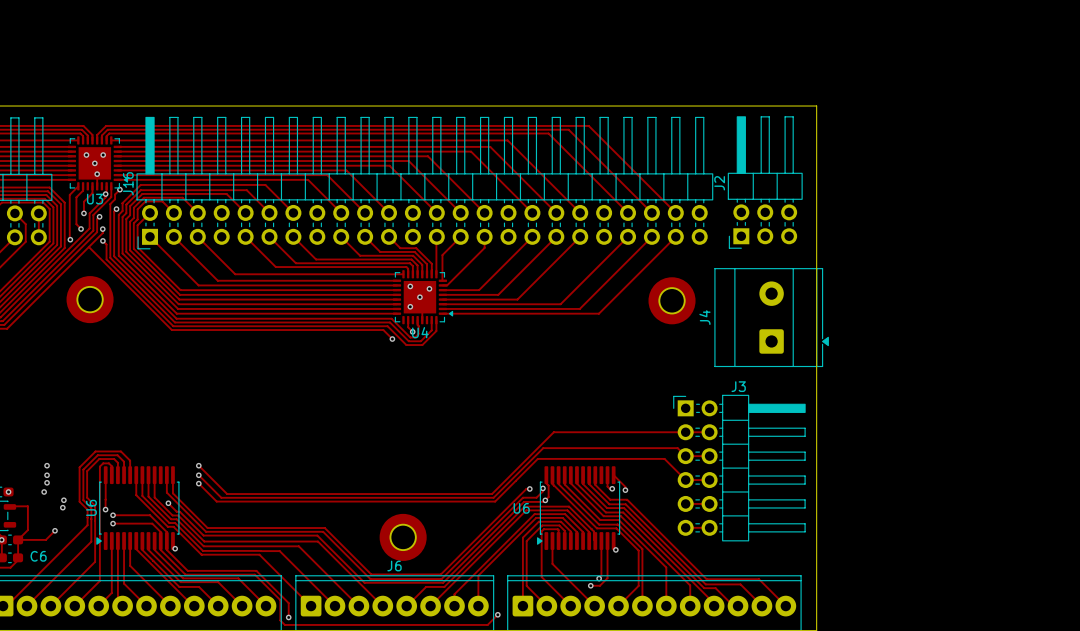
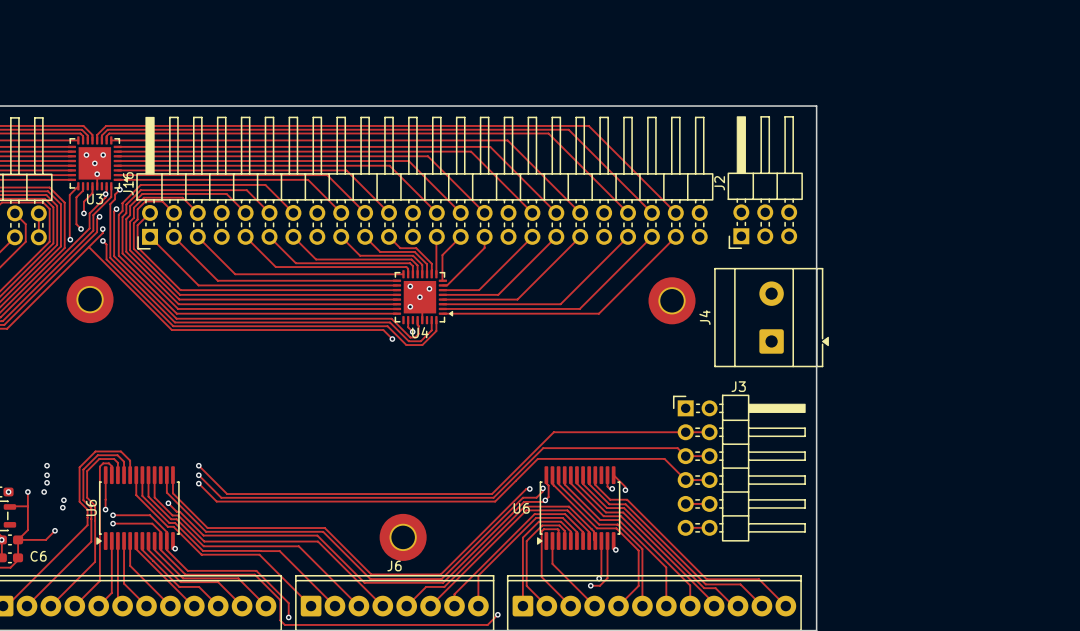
track: none -> (27, 491) (27, 506)
via: none -> (27, 491)

